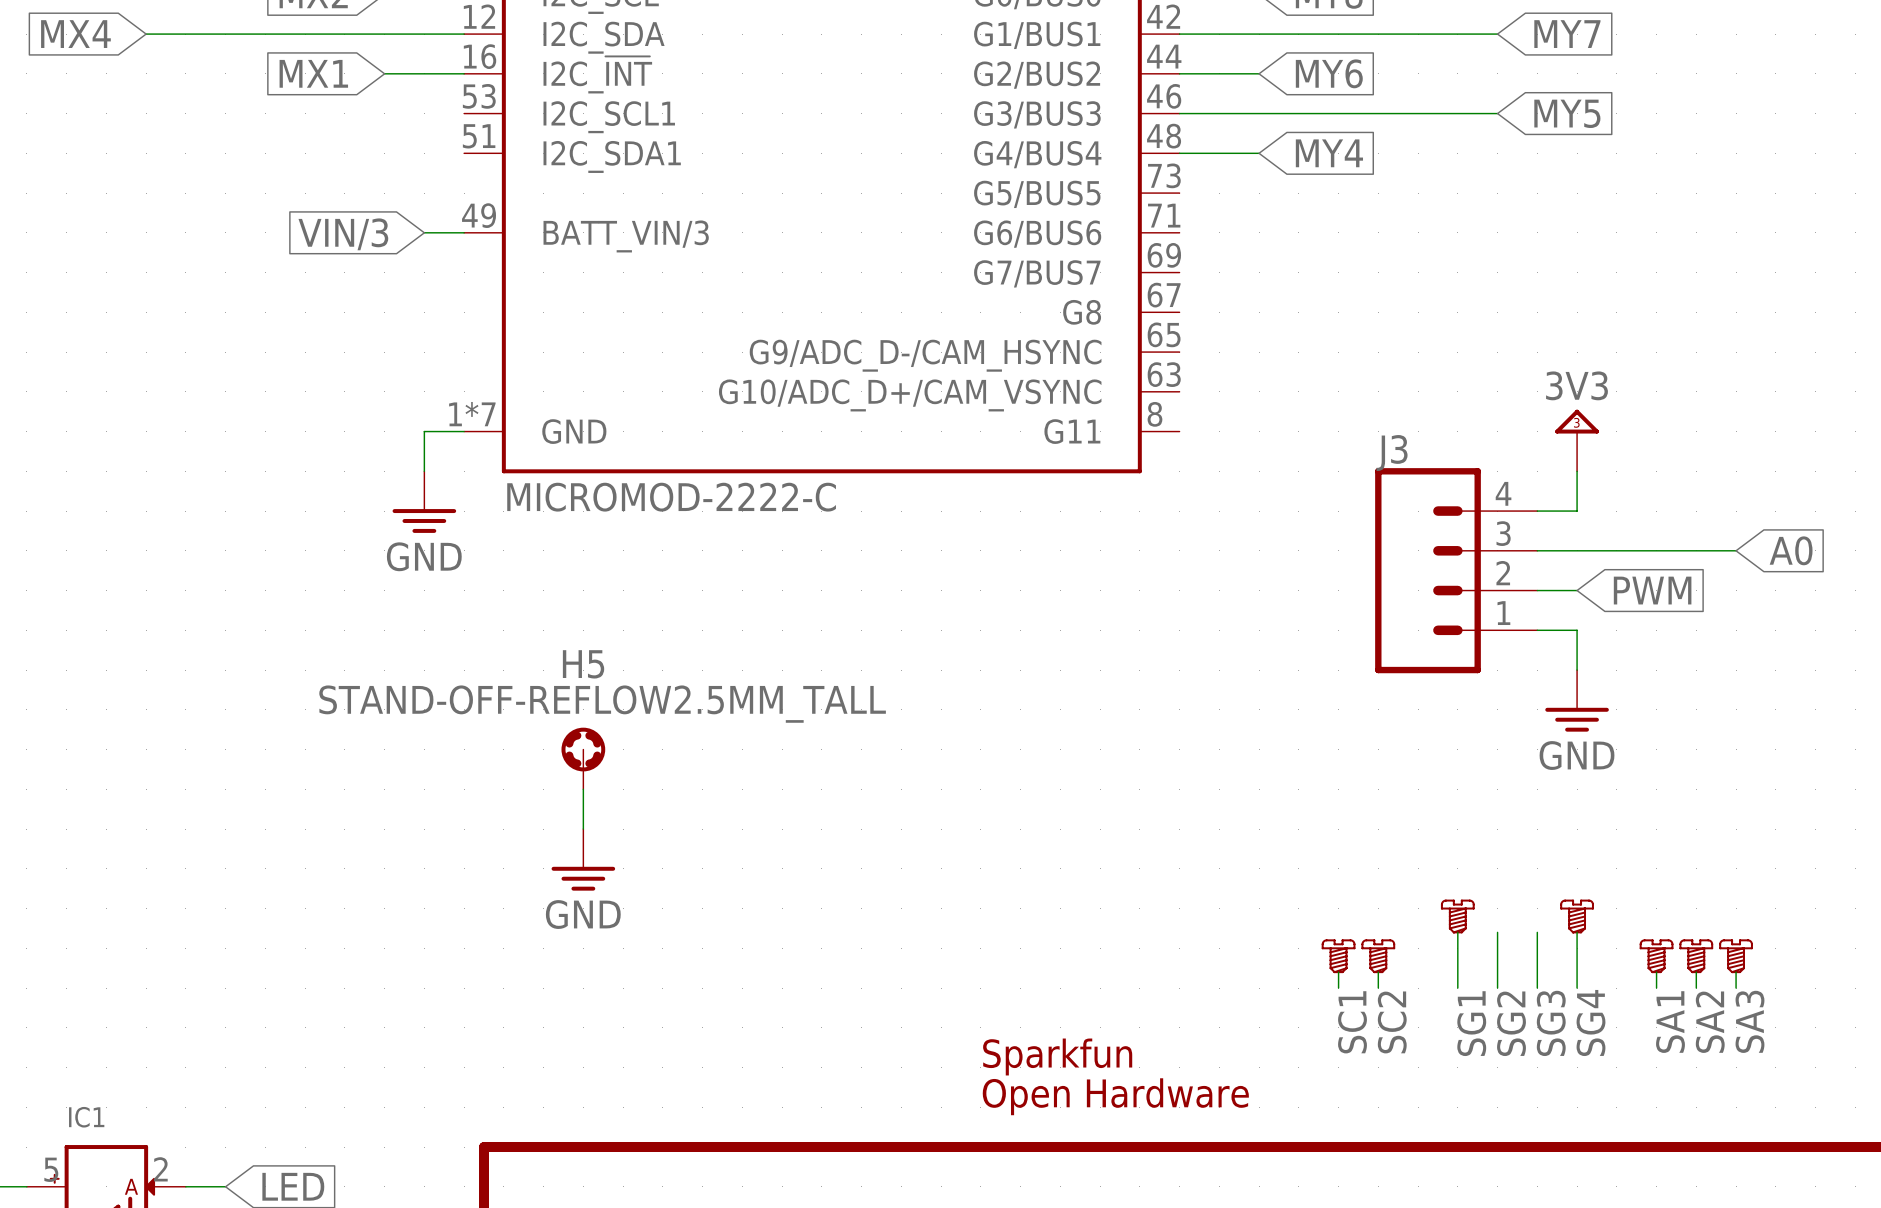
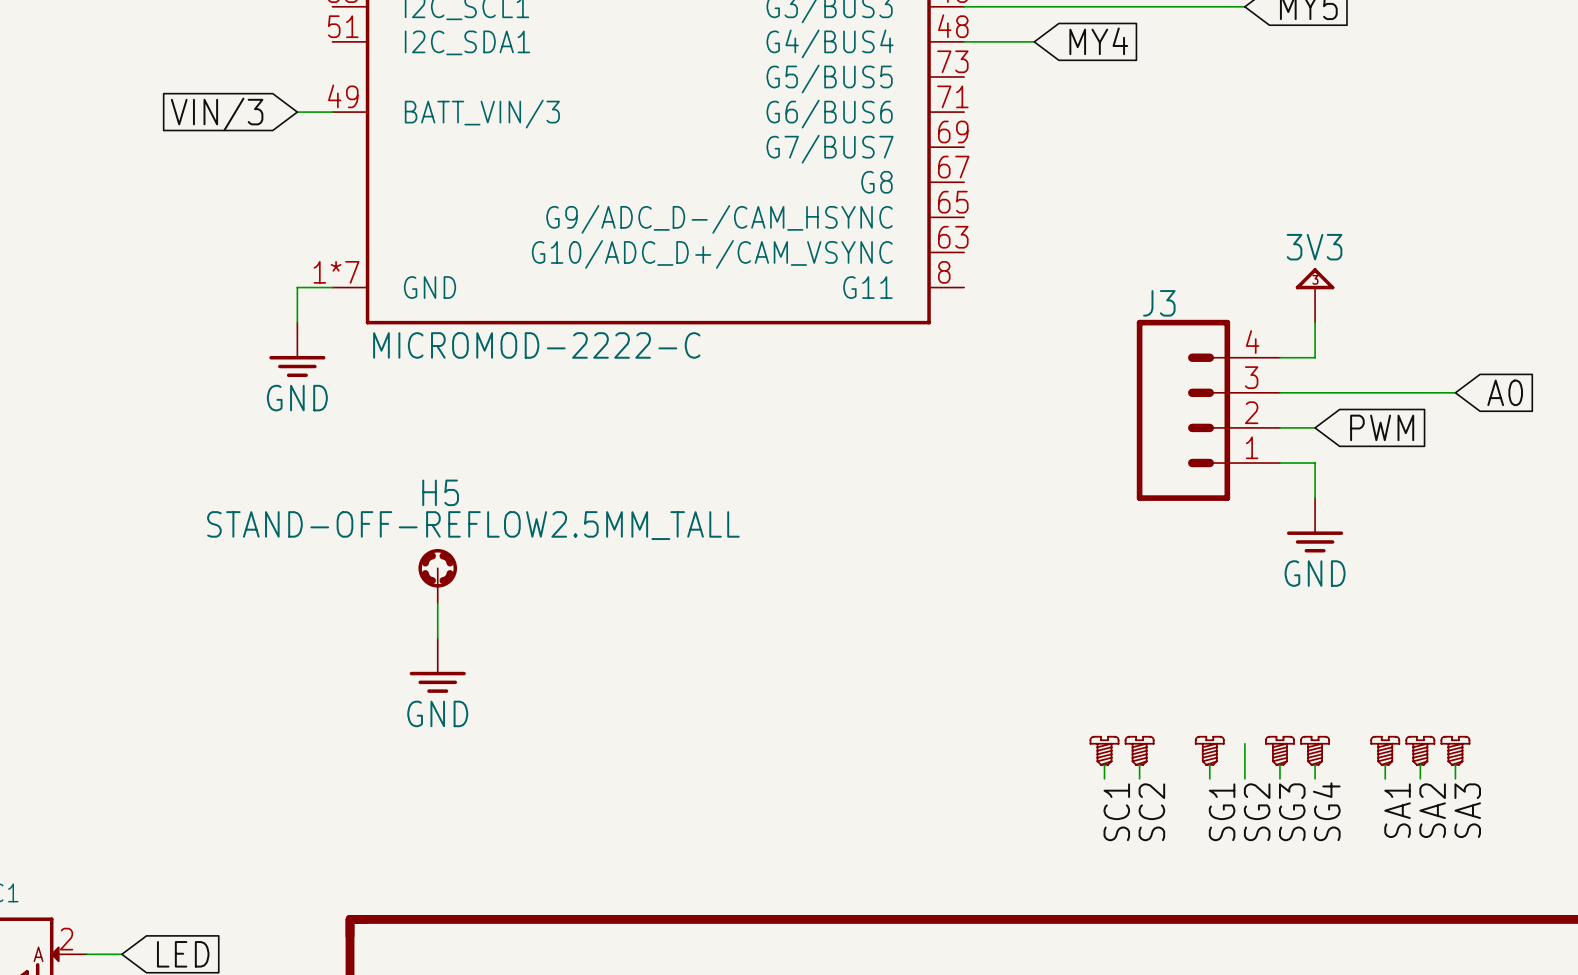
part position: (1457, 916) -> (1209, 750)
part: (1577, 916) -> none
wire: (1457, 932) (1457, 972) -> none
wire: (1497, 932) (1497, 948) -> none
wire: (1537, 932) (1537, 972) -> none
wire: (1577, 932) (1577, 972) -> none
part: none -> (1279, 750)
part: none -> (1315, 750)
part: (1057, 1057) -> none
part: (1115, 1096) -> none

